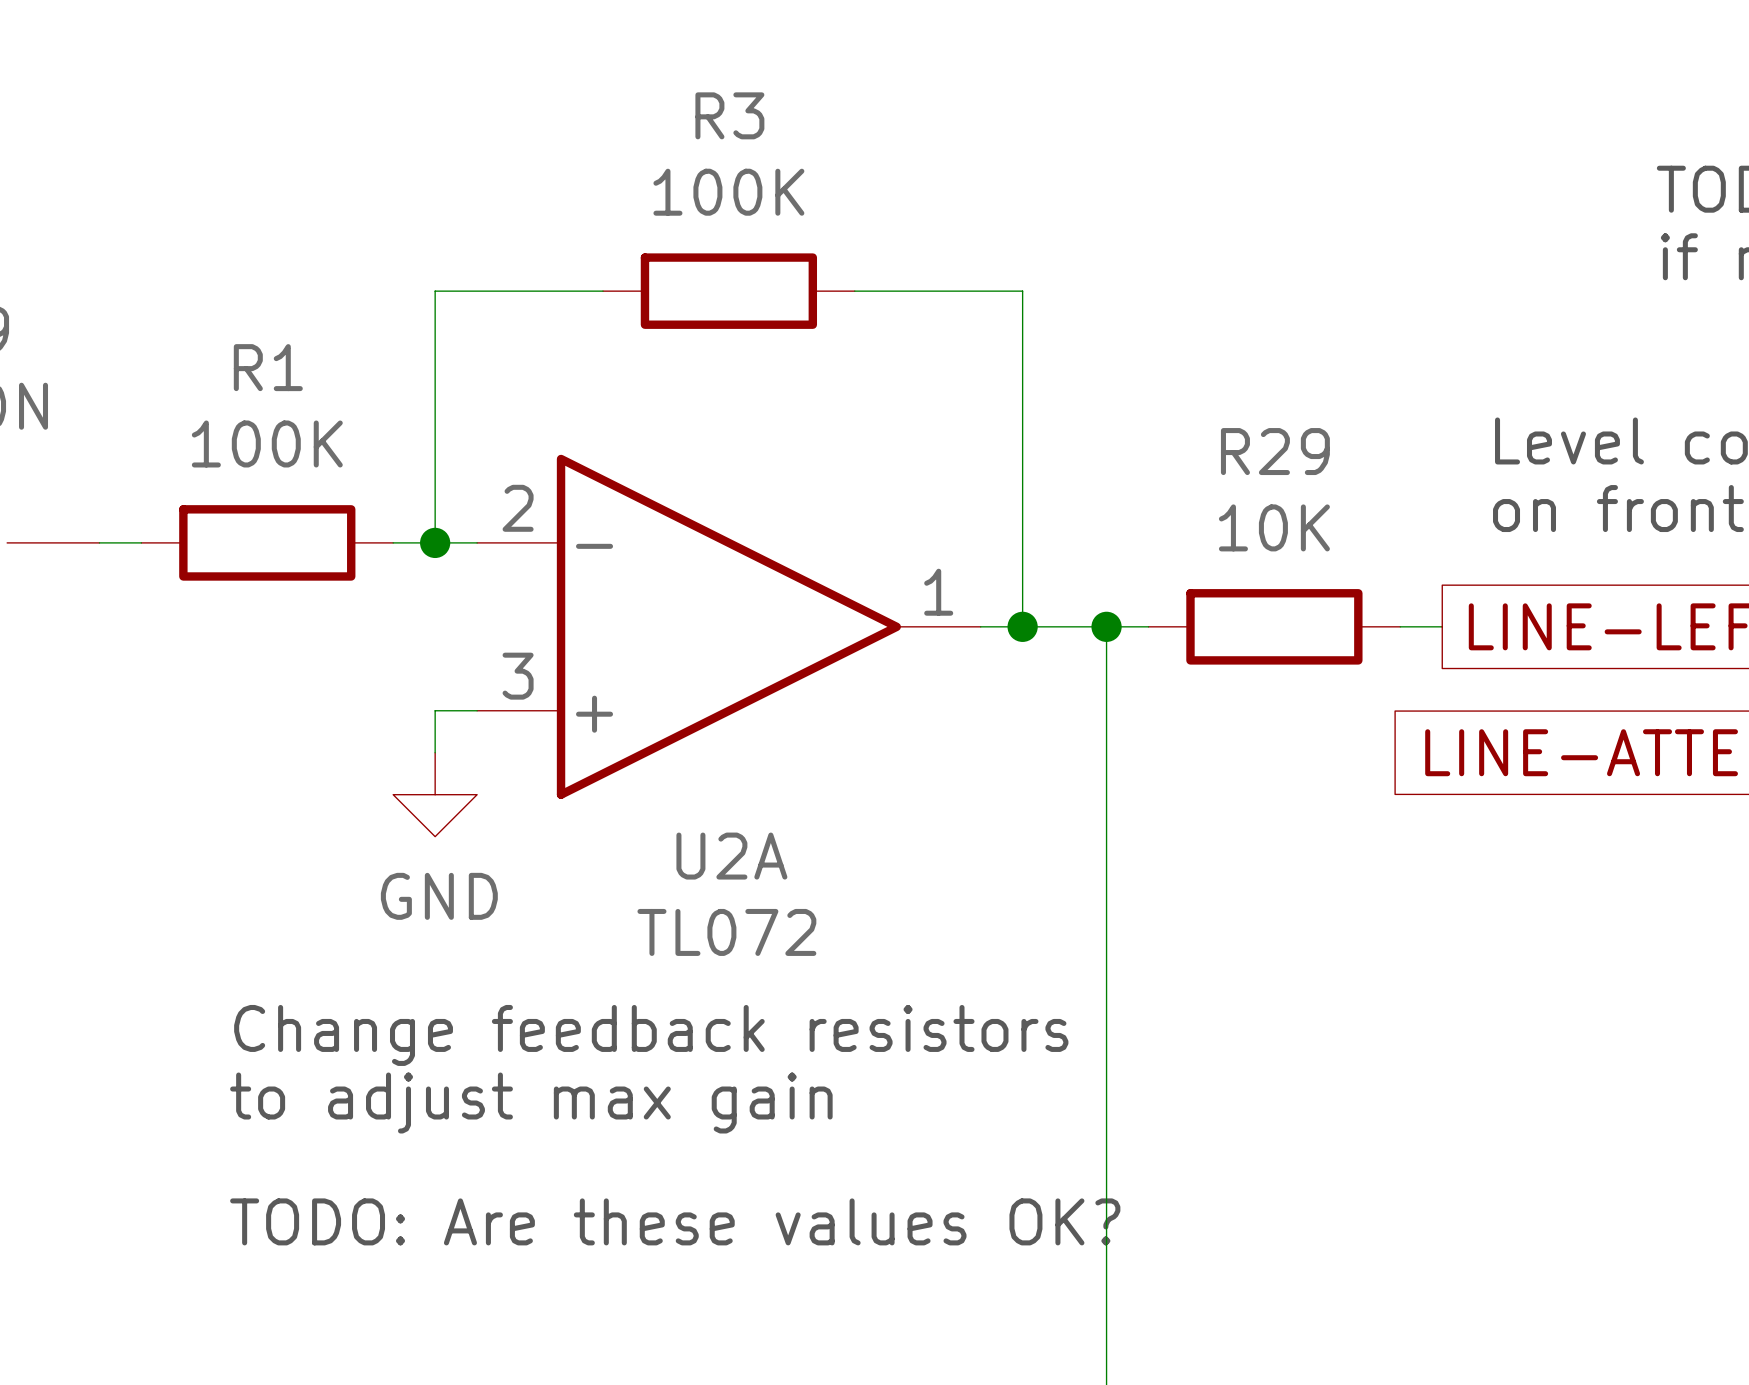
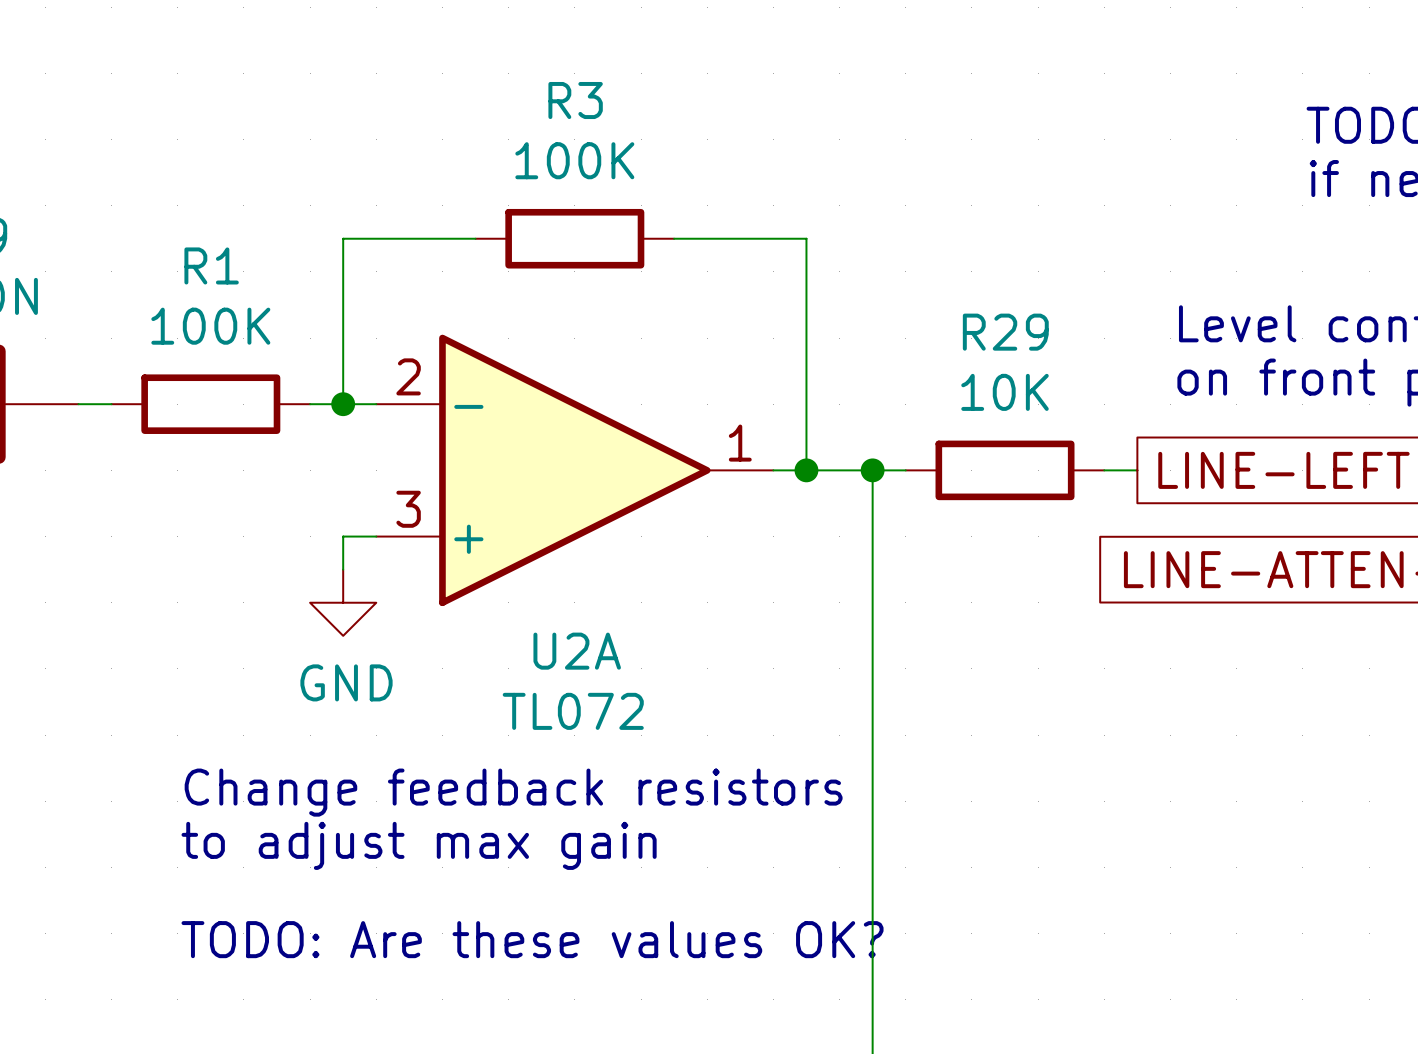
wire: (603, 291) (435, 291) (435, 333) -> (475, 238) (343, 238)
R3 position: (728, 291) -> (574, 238)
wire: (854, 291) (1022, 291) (1022, 333) -> (674, 238) (806, 238)

